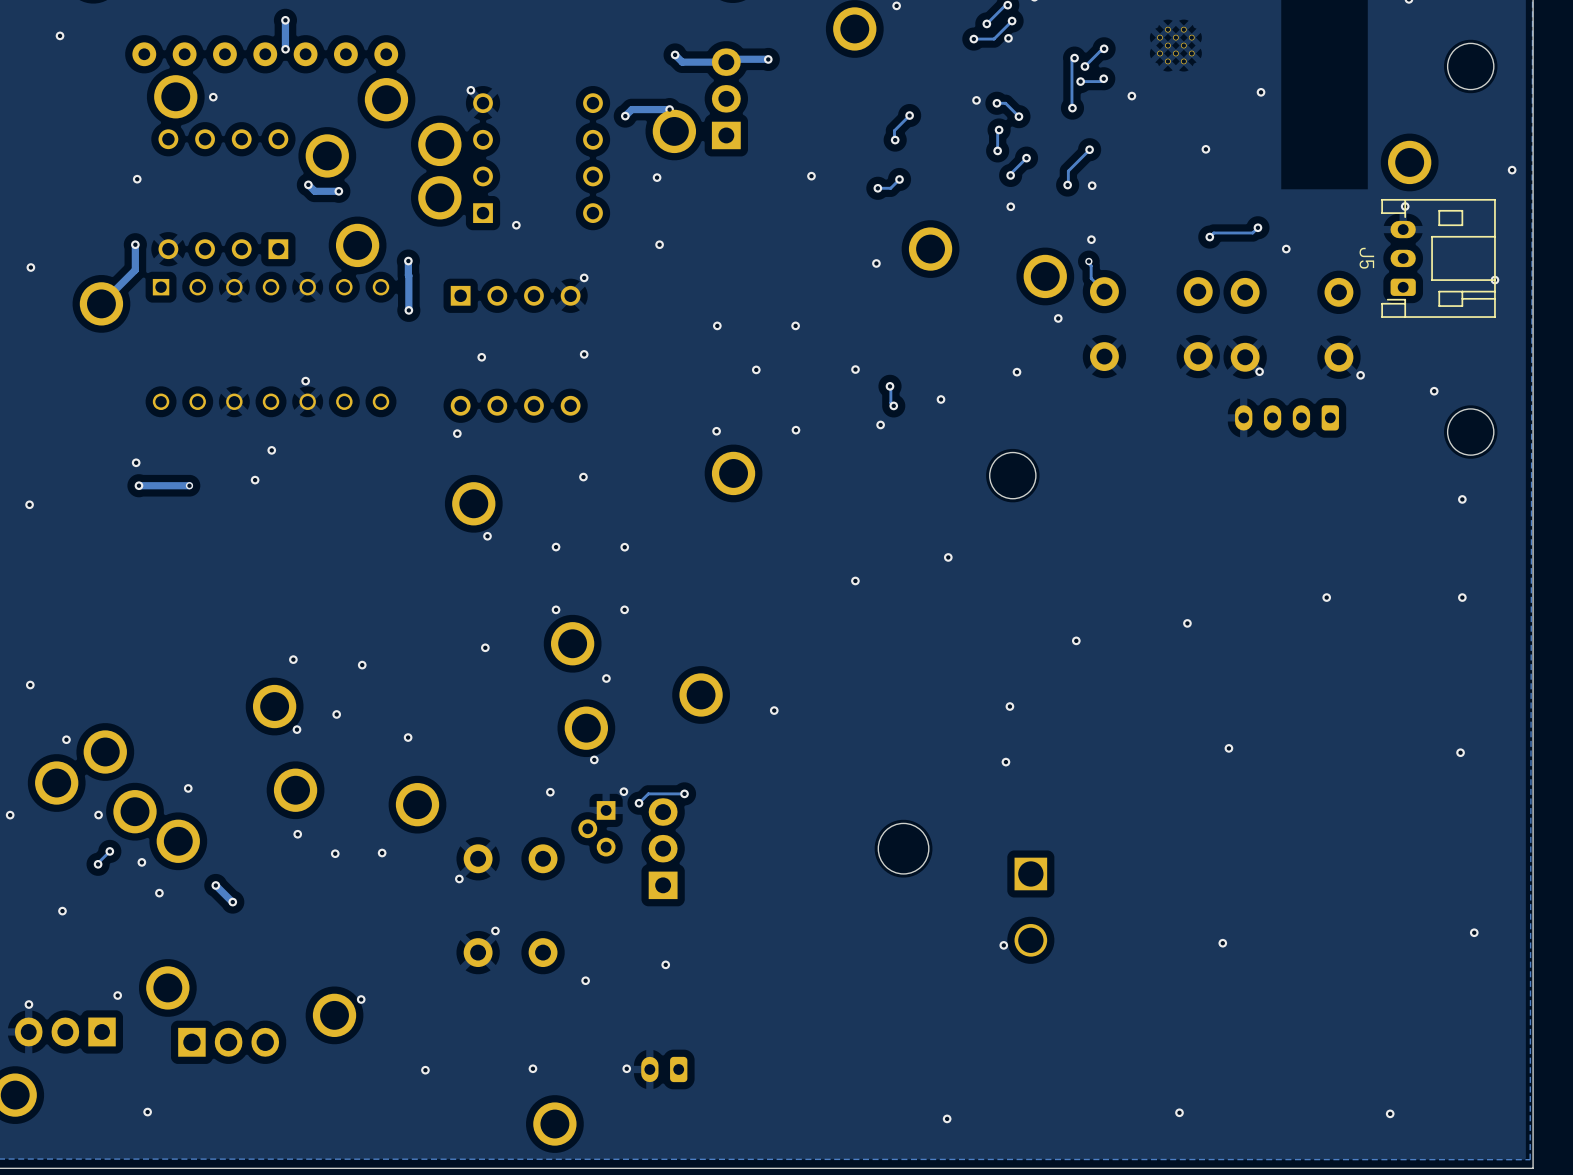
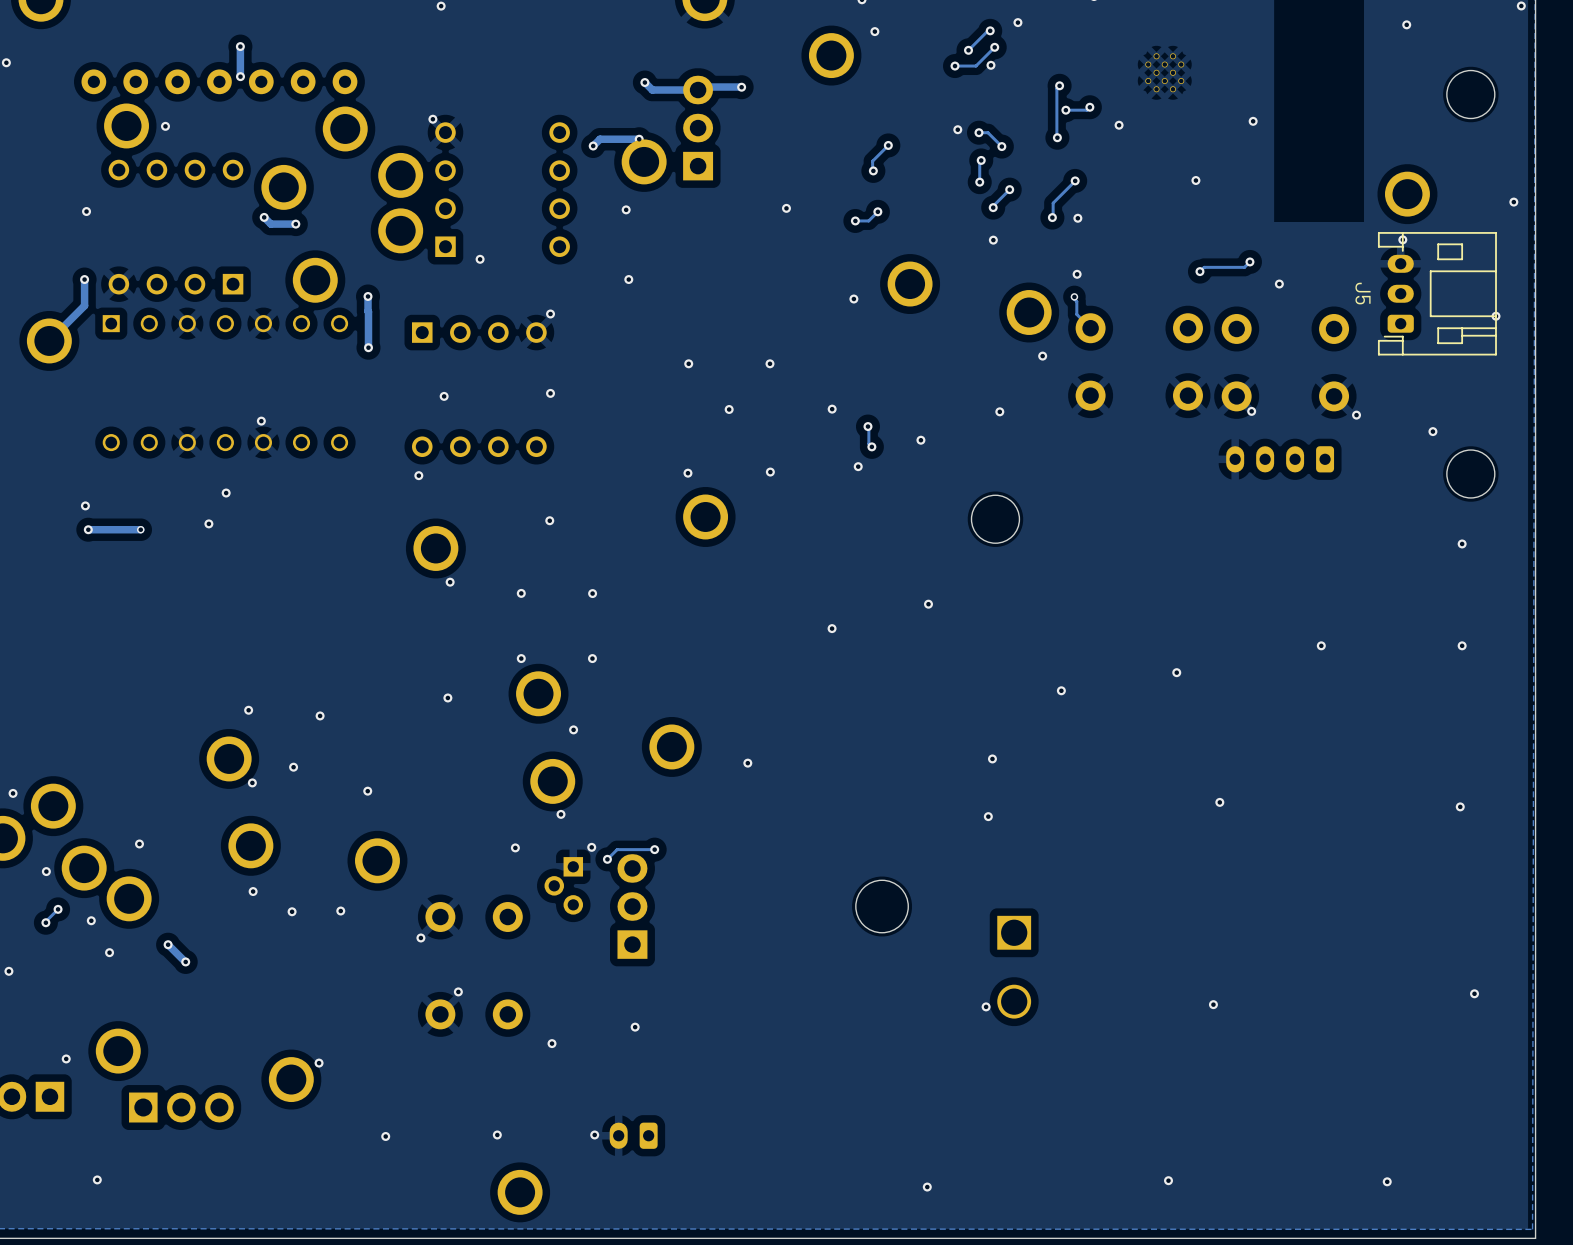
track: (1104, 48) (1084, 66) -> none
via: (1104, 48) -> none
via: (1084, 66) -> none

